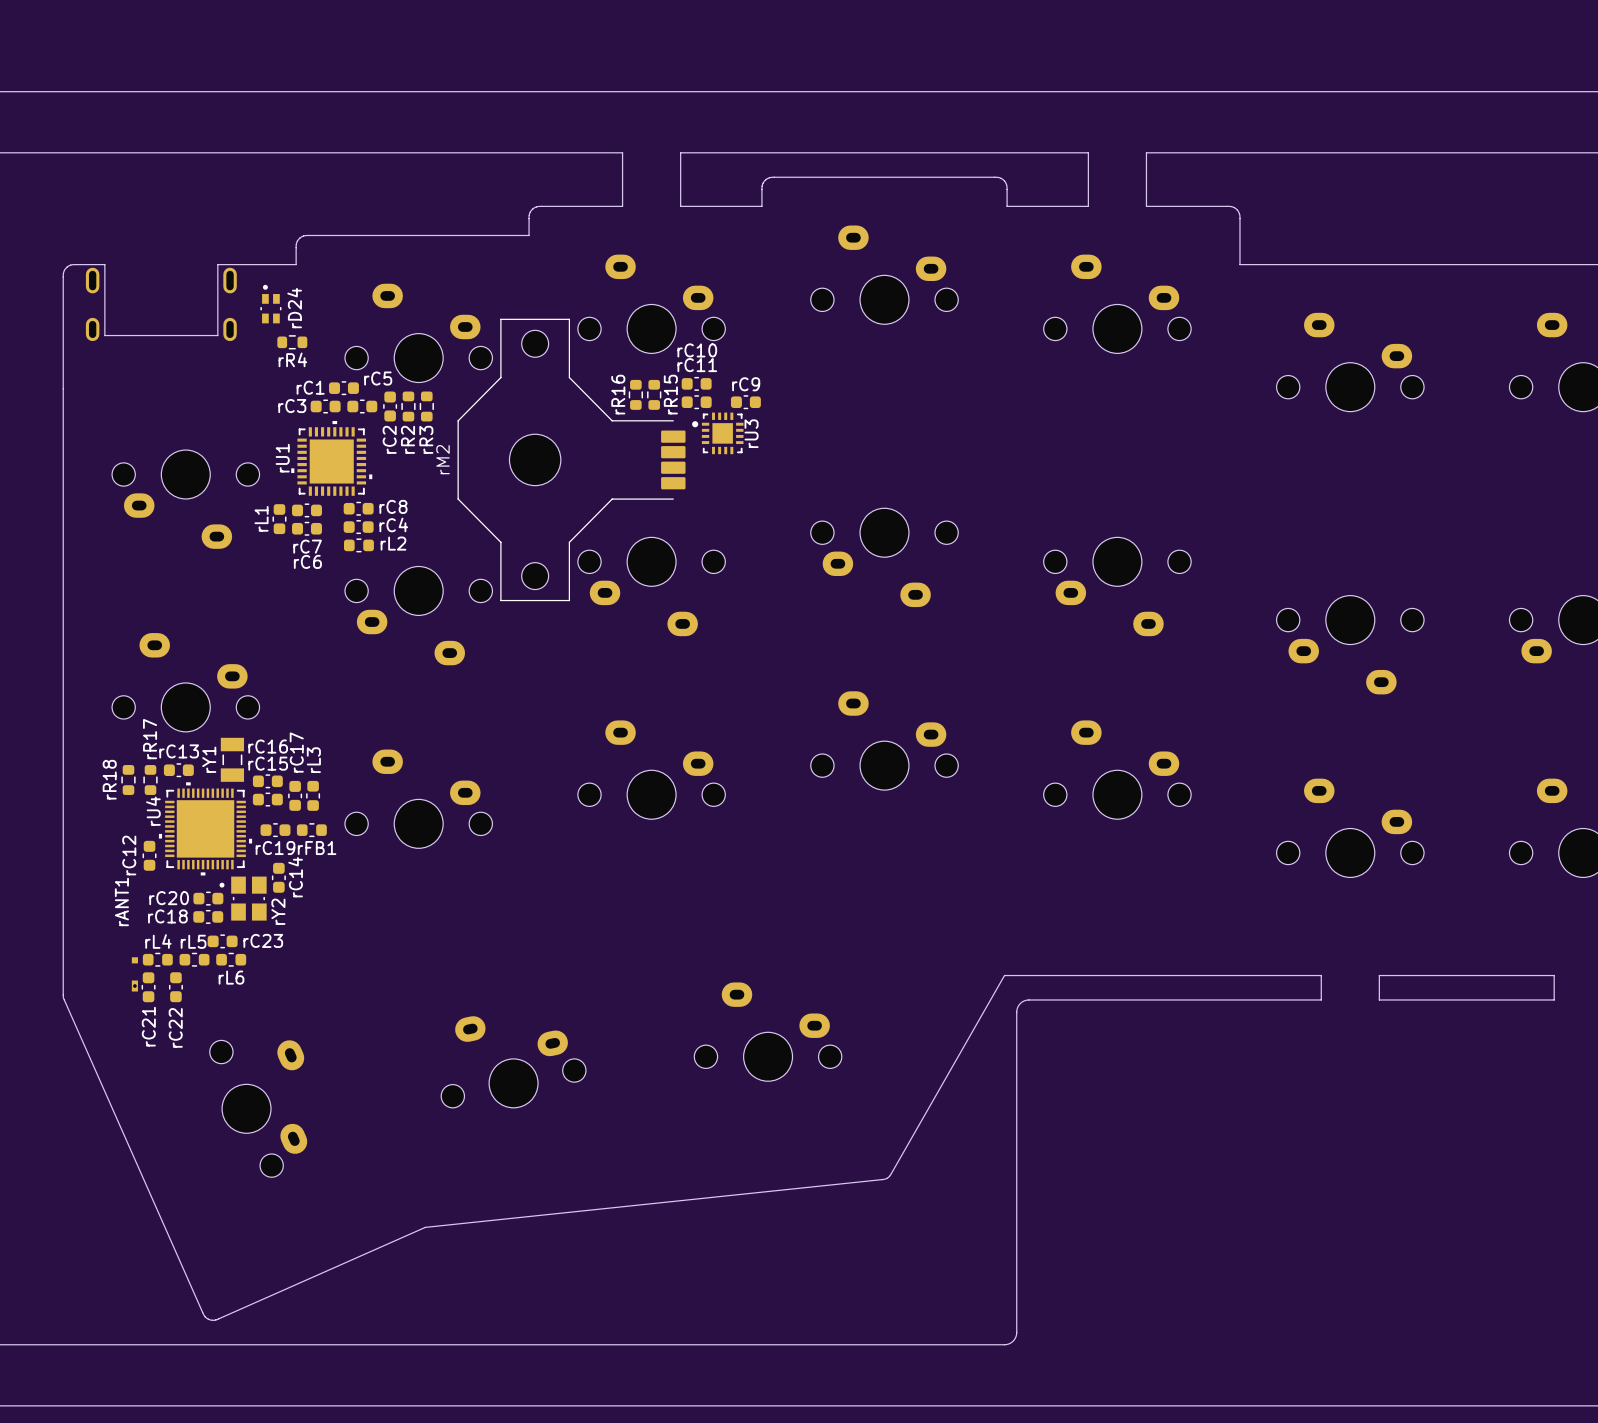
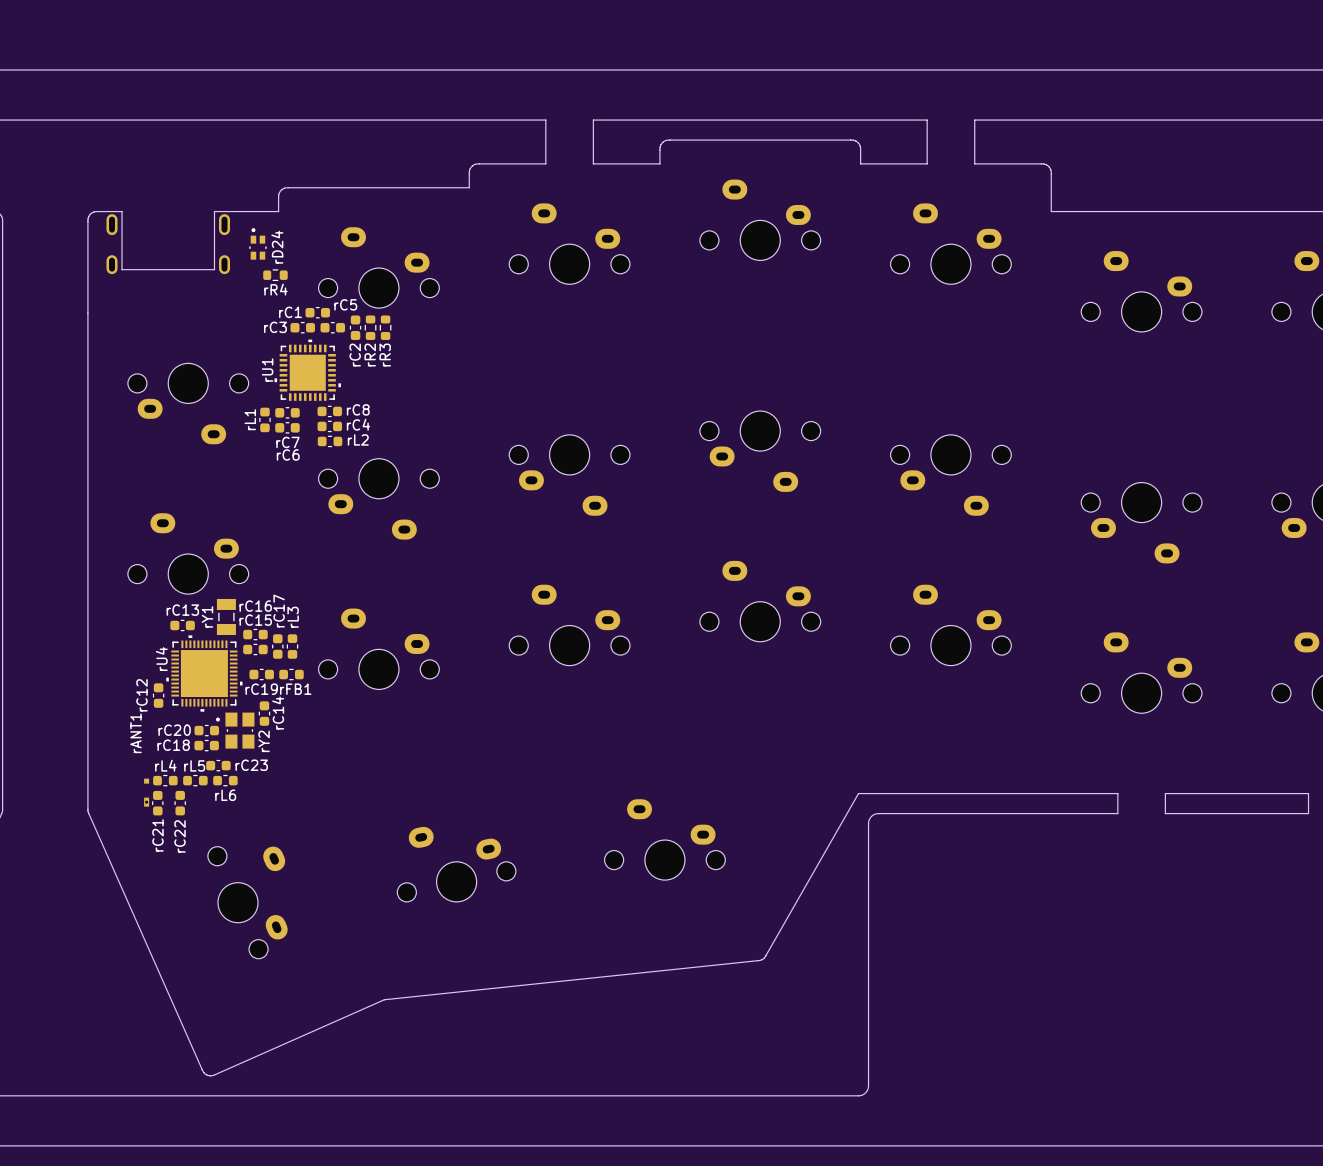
rC10: (696, 383) -> none
rR16: (635, 394) -> none
rR15: (654, 394) -> none
rC11: (696, 402) -> none
rC9: (745, 402) -> none
rU3: (717, 433) -> none
rM2: (571, 459) -> none
rR18: (128, 780) -> none
rR17: (150, 780) -> none

